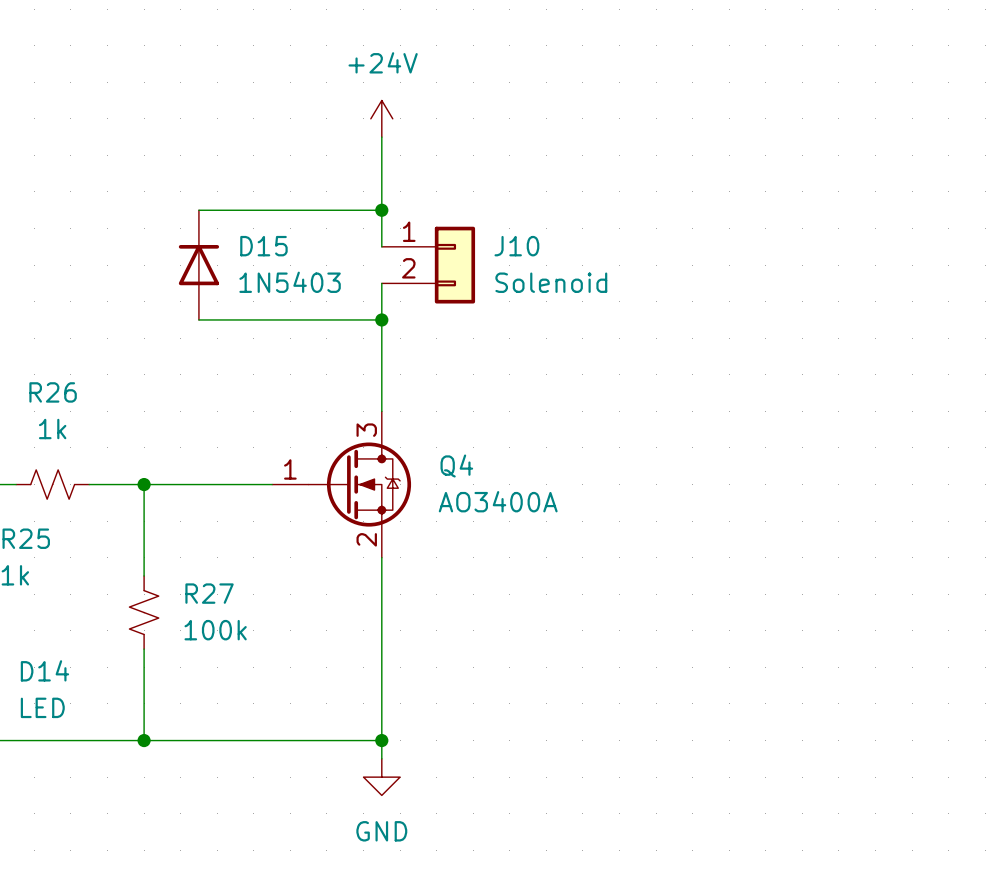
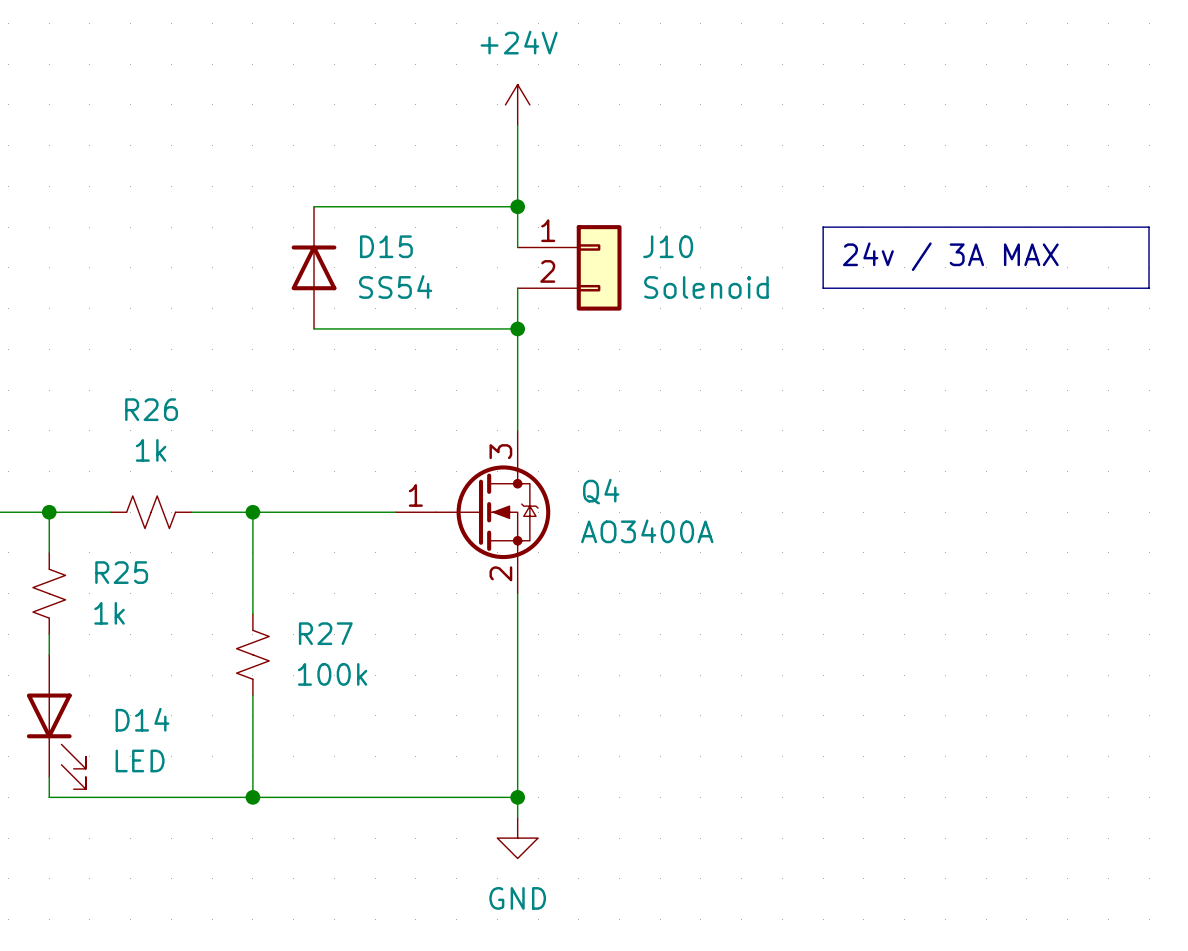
line: none -> (823, 227) (1149, 227) (1149, 288) (823, 288) (823, 227)
text: none -> 24v / 3A MAX (950, 256)
D15 value: 1N5403 (290, 282) -> SS54 (395, 286)

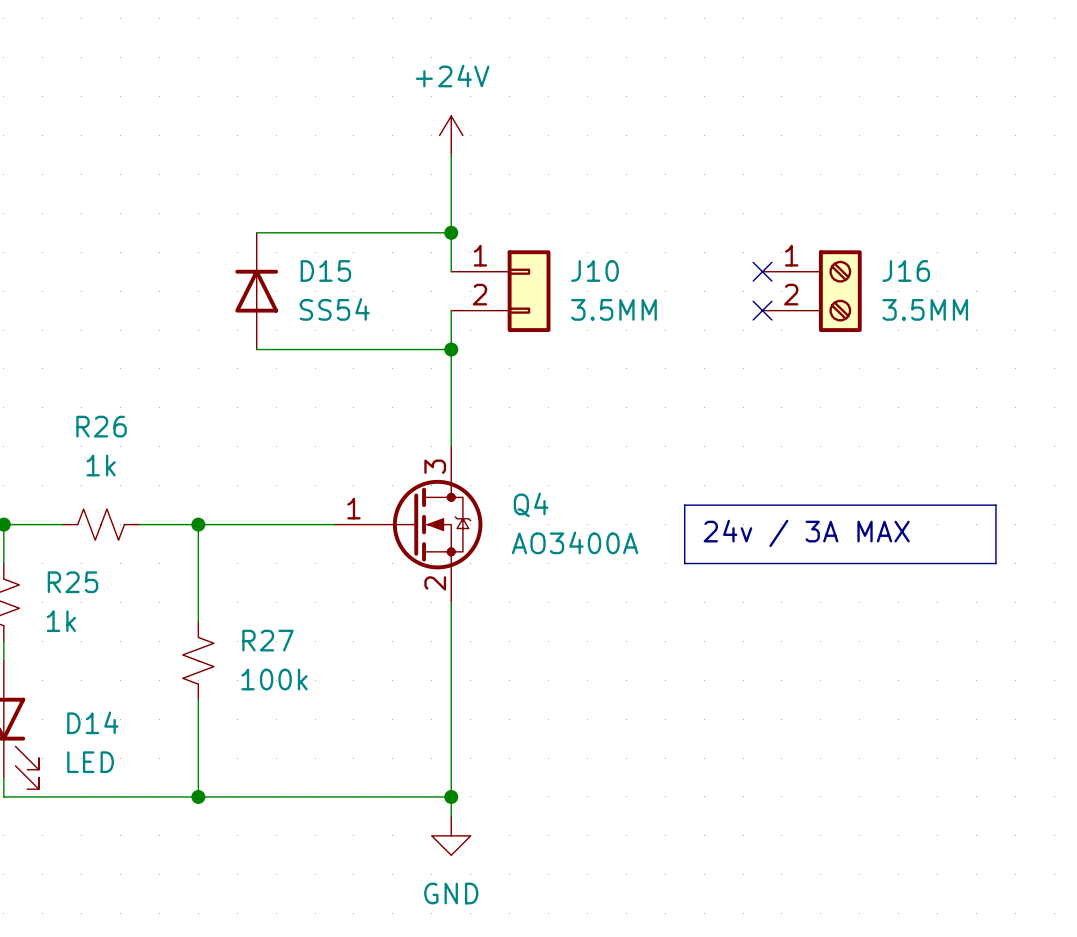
line: (823, 227) (1149, 227) (1149, 288) (823, 288) (823, 227) -> (684, 505) (995, 505) (995, 563) (684, 563) (684, 505)
no-connect mark: none -> (762, 271)
text position: 24v / 3A MAX (950, 256) -> 24v / 3A MAX (806, 533)
J16: none -> 3.5MM (812, 291)
J10 value: Solenoid (706, 287) -> 3.5MM (613, 309)
no-connect mark: none -> (762, 310)

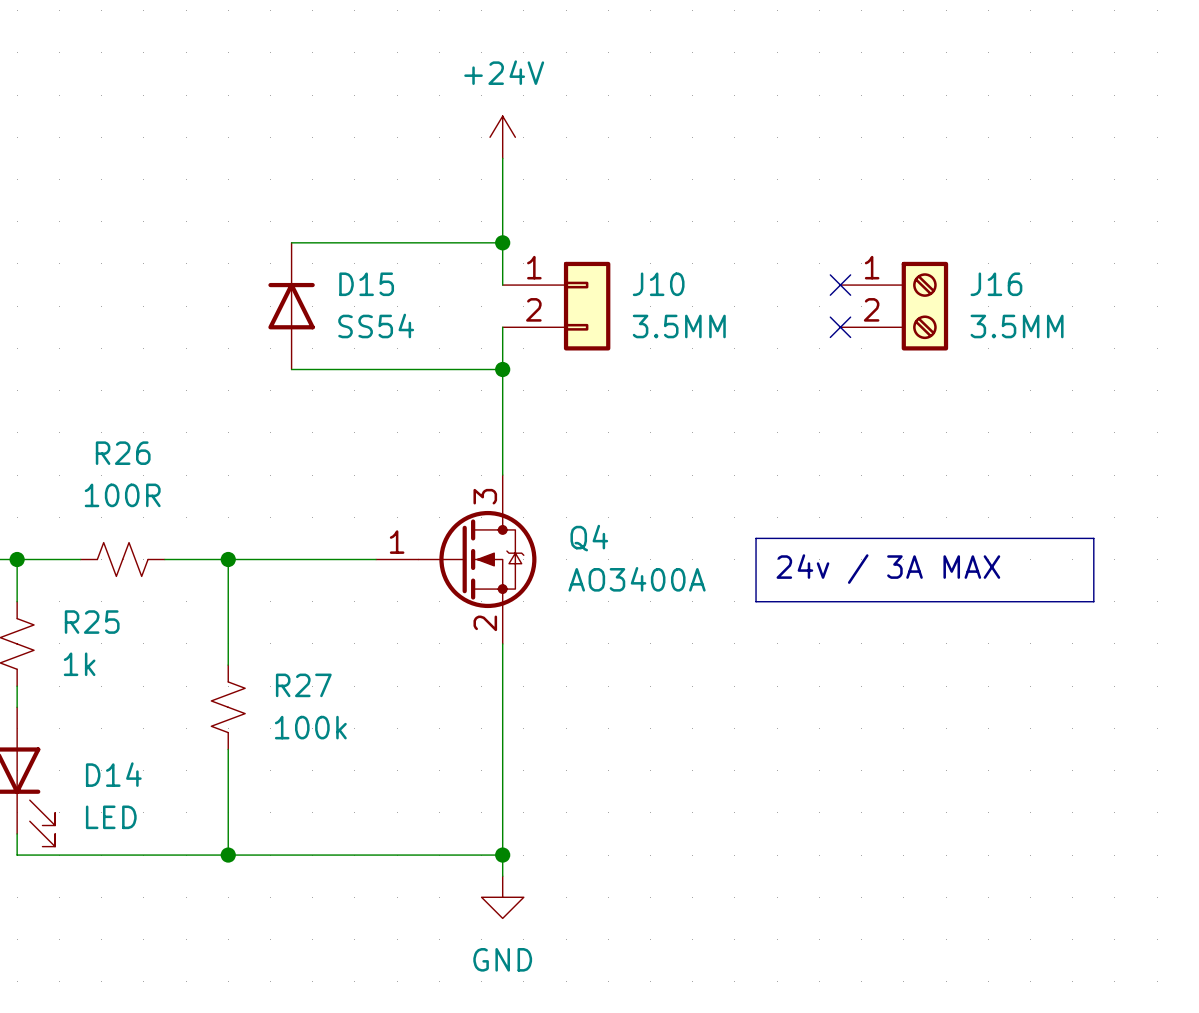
R26 value: 1k (101, 465) -> 100R (122, 495)

